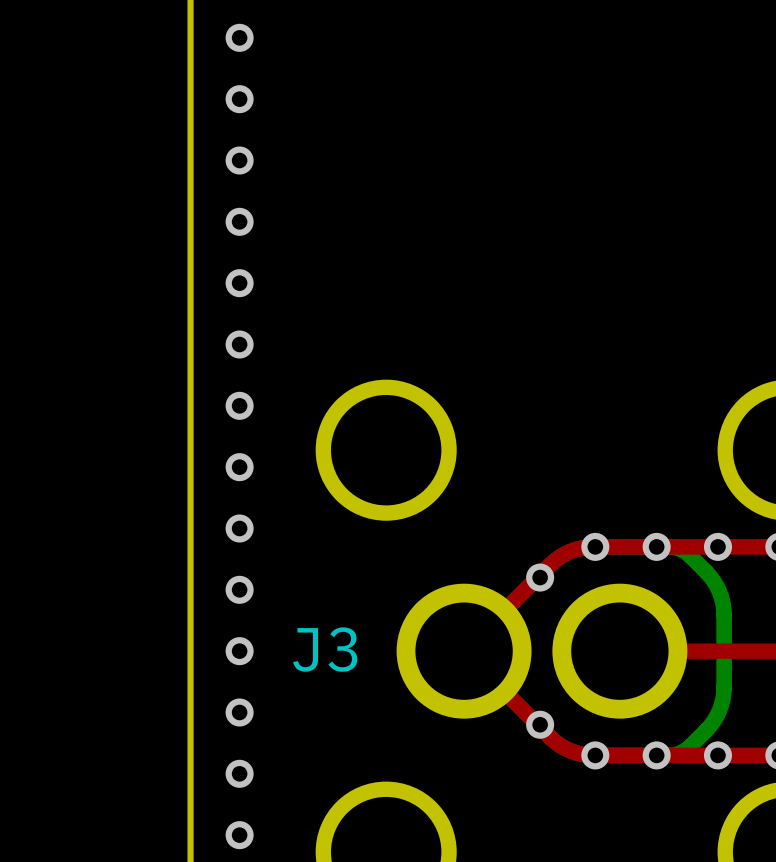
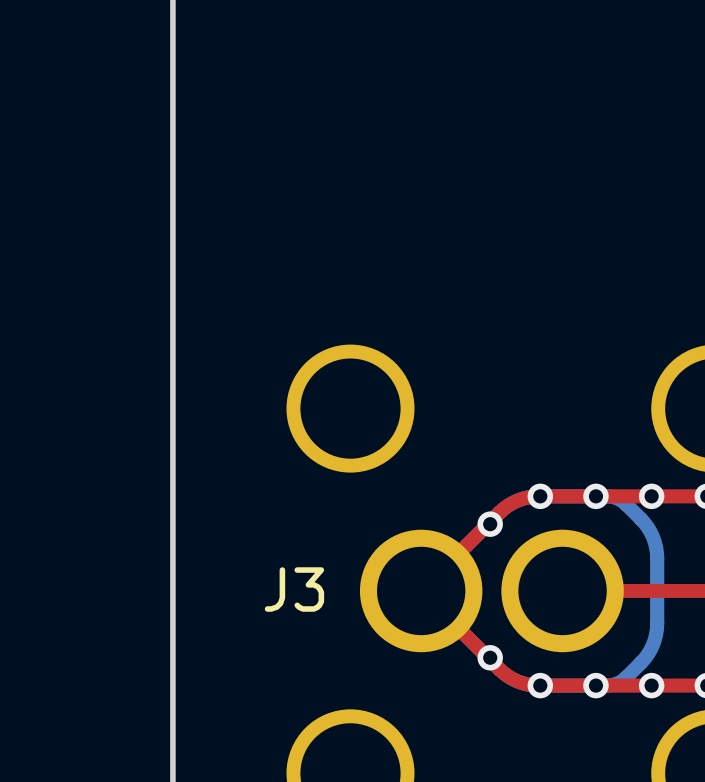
via: (239, 37) -> none
via: (239, 99) -> none
via: (239, 160) -> none
via: (239, 221) -> none
via: (239, 283) -> none
via: (239, 344) -> none
via: (239, 405) -> none
via: (239, 467) -> none
via: (239, 528) -> none
via: (239, 589) -> none
via: (239, 651) -> none
via: (239, 712) -> none
via: (239, 773) -> none
via: (239, 835) -> none

